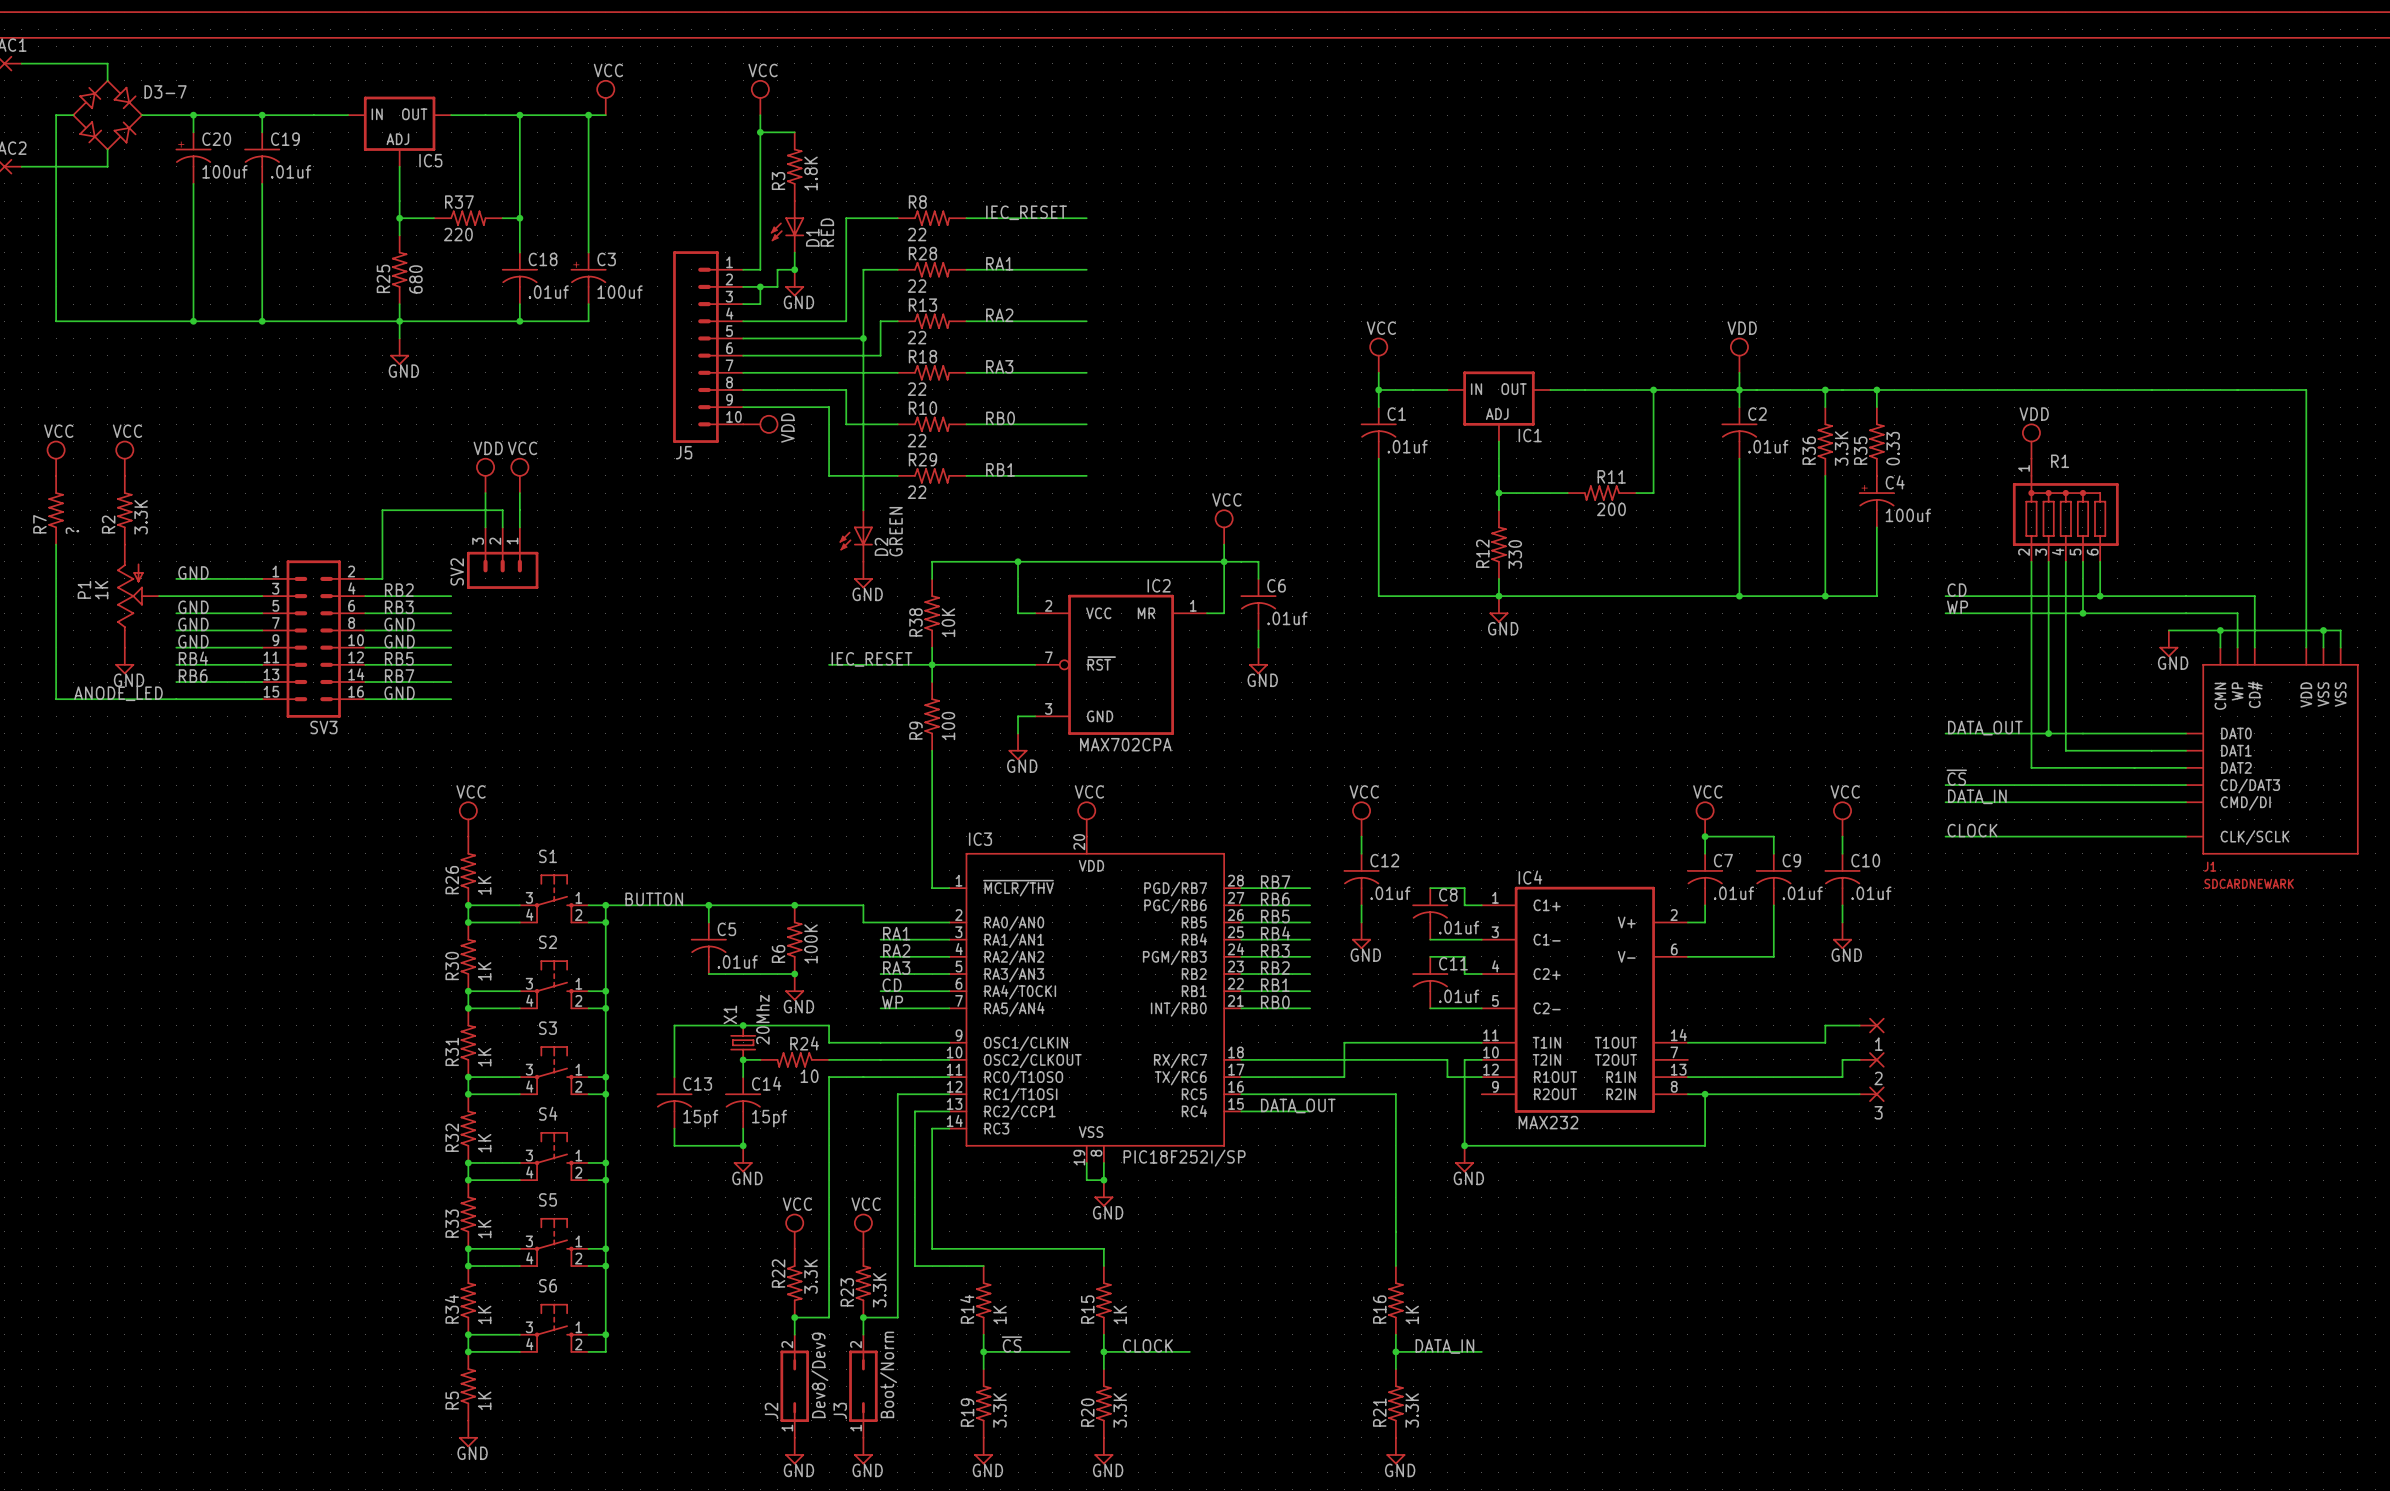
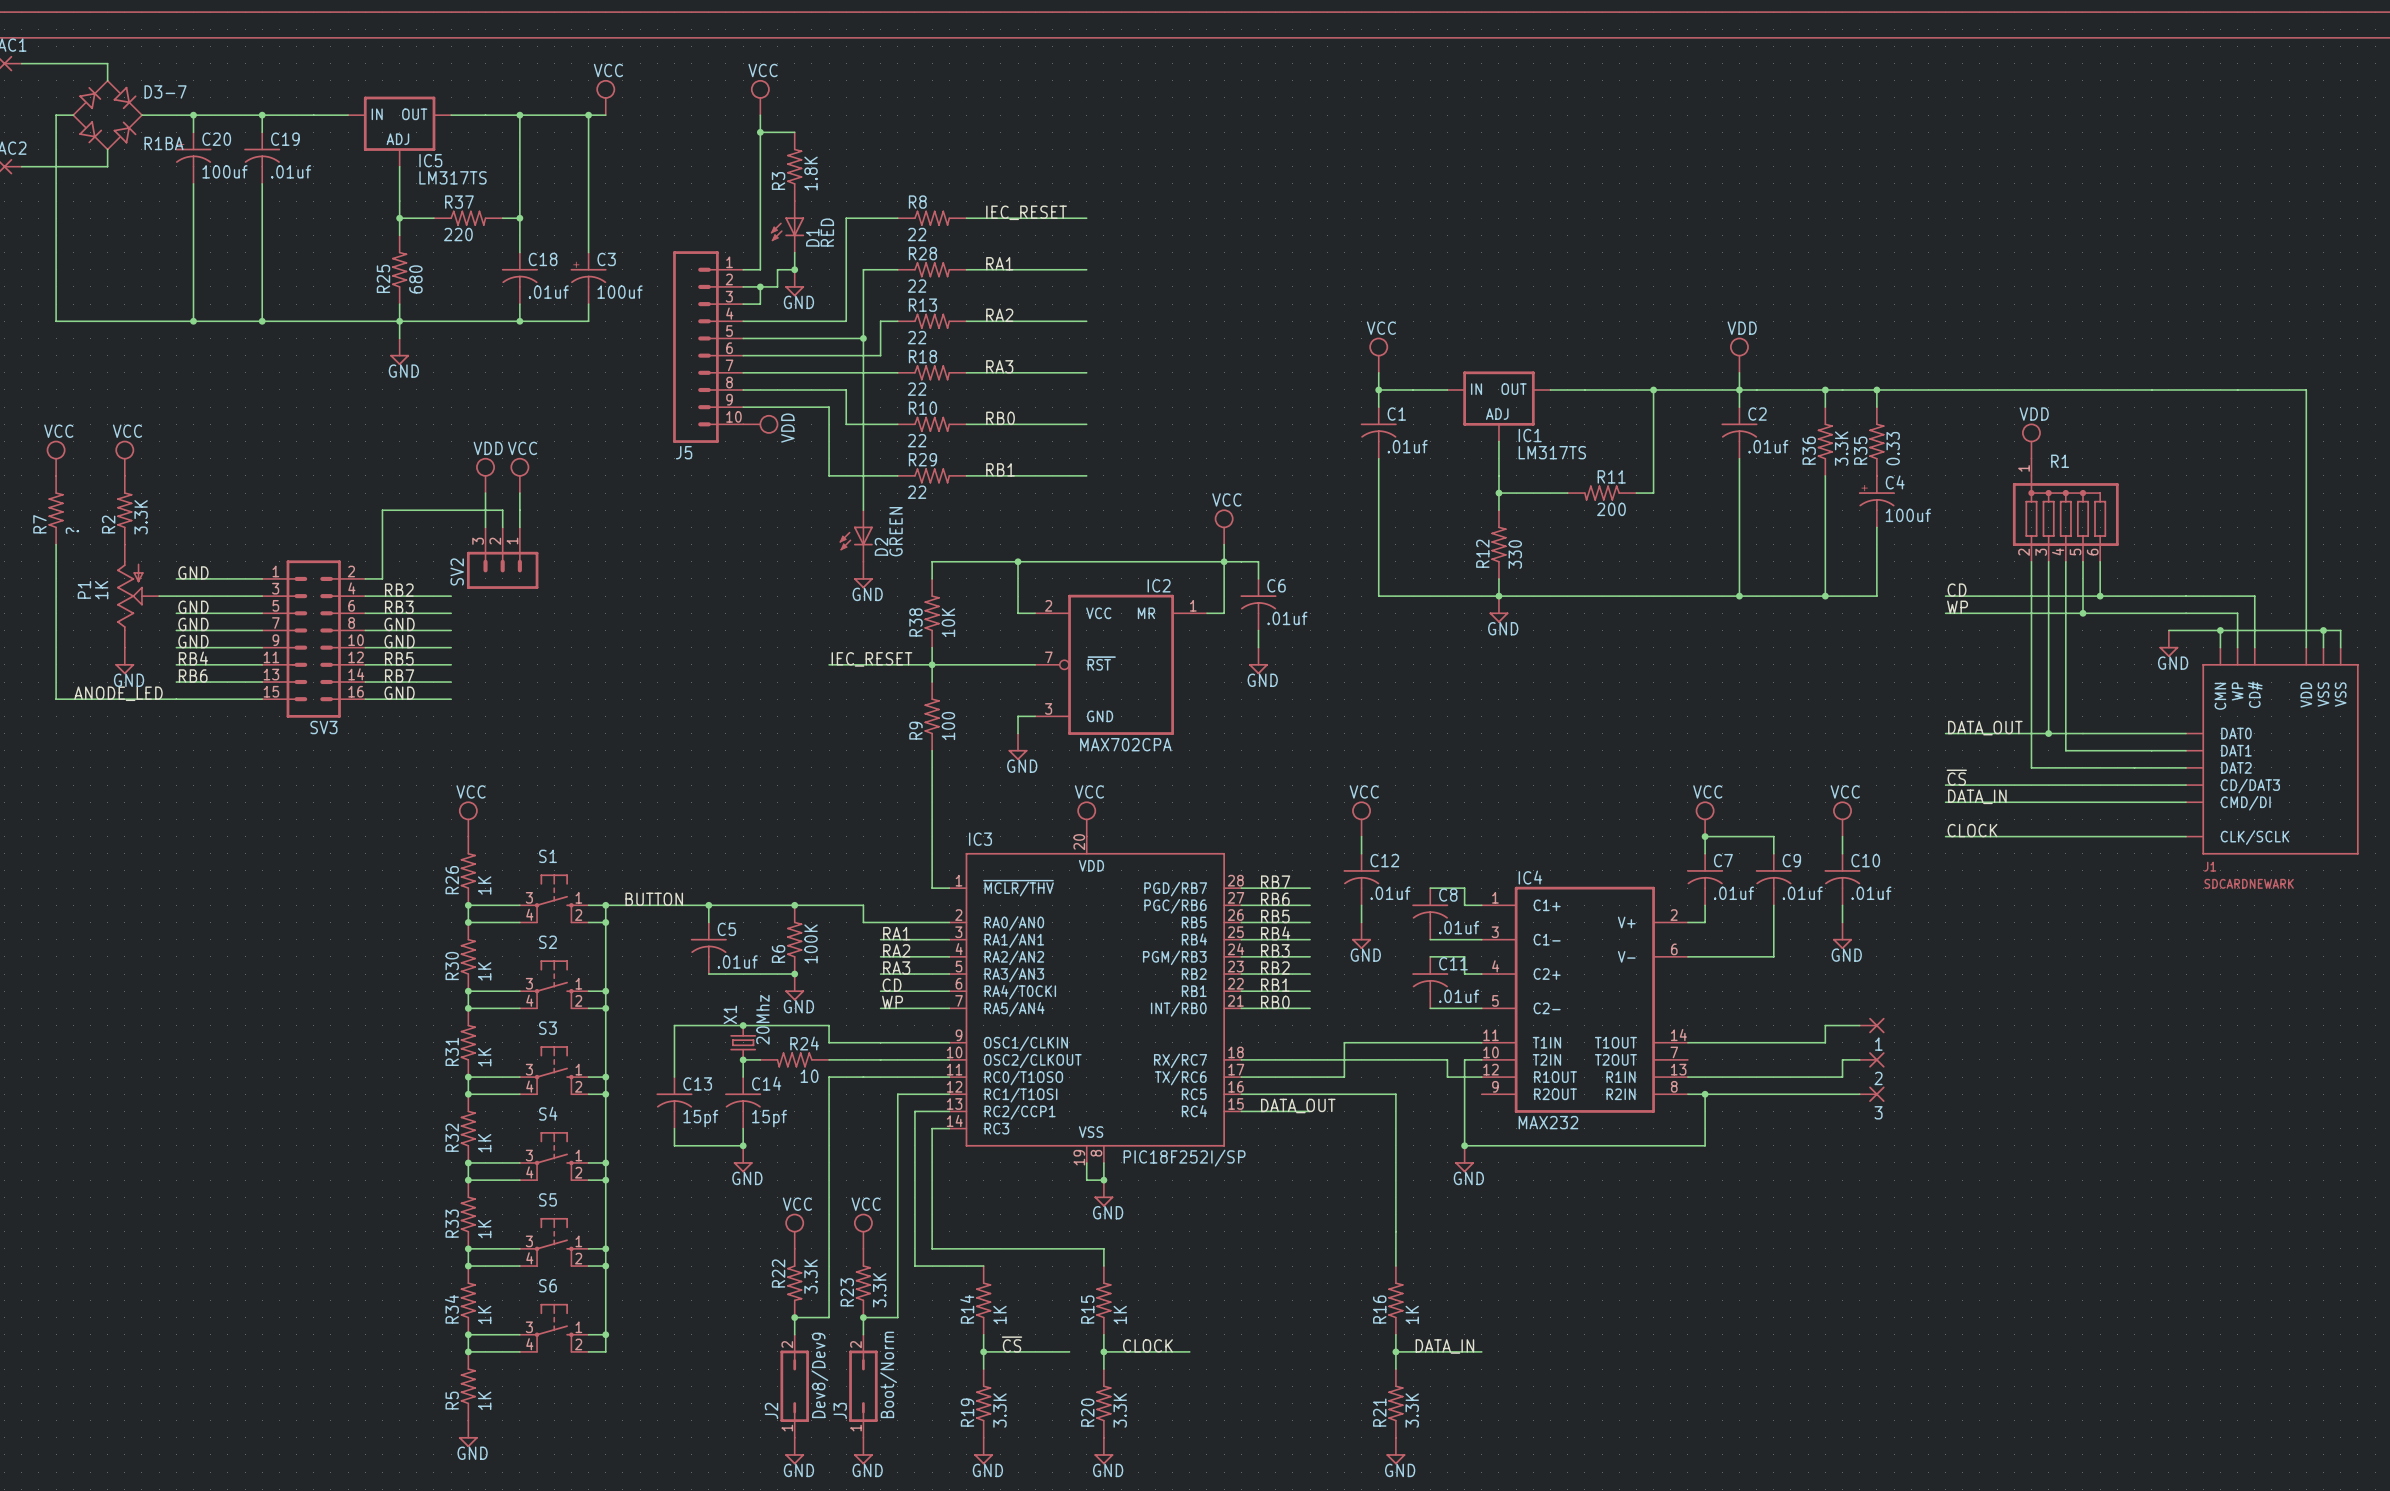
D3-7 value: none -> R1BA (163, 143)
IC5 value: none -> LM317TS (453, 177)
IC1 value: none -> LM317TS (1552, 452)

